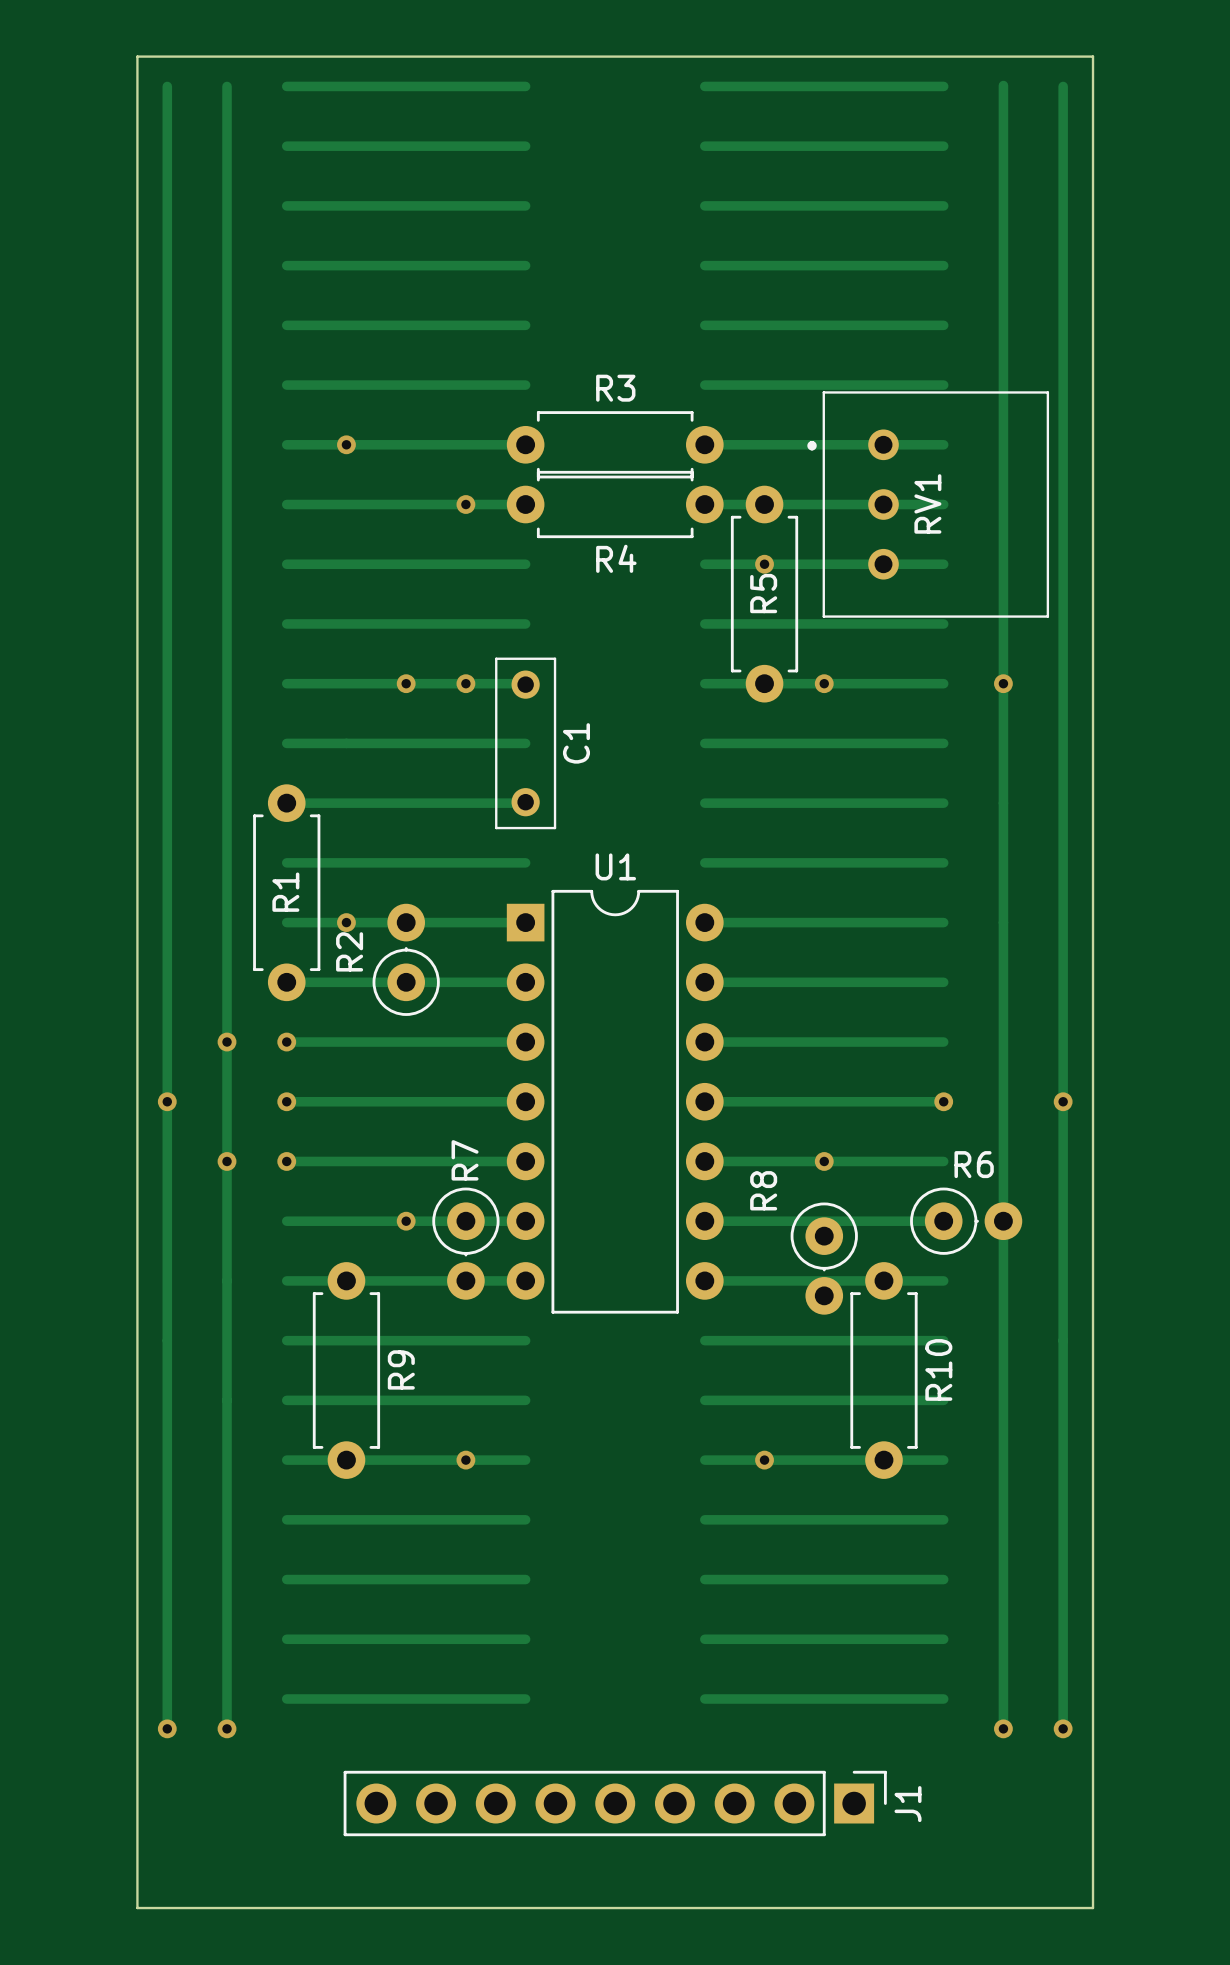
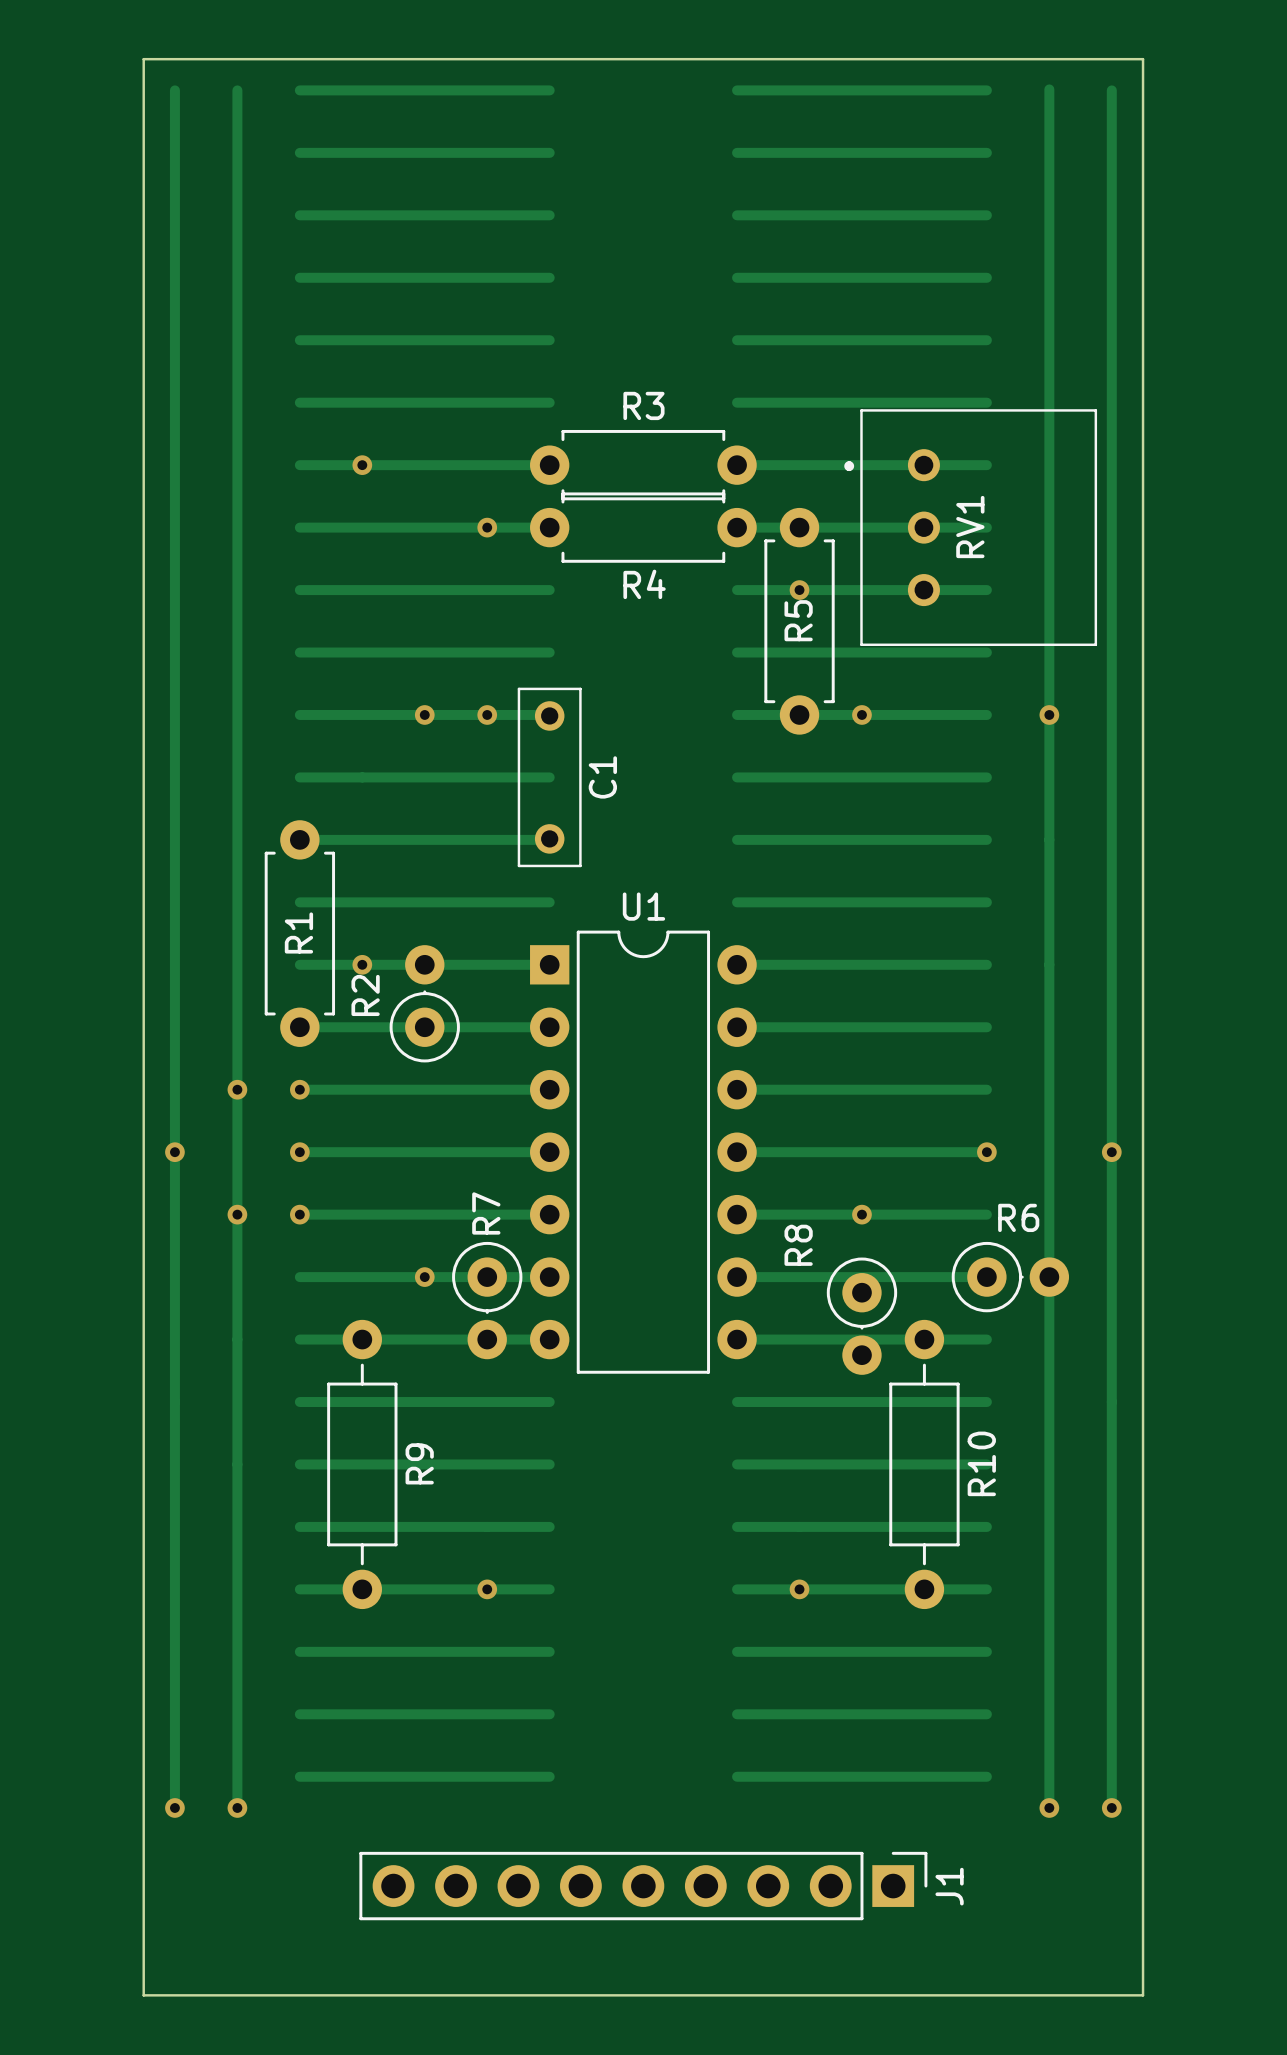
R9 footprint: [312, 1262, 381, 1479] -> [327, 1319, 398, 1610]
R10 footprint: [850, 1262, 918, 1479] -> [889, 1319, 960, 1610]
via position: (465, 1460) -> (487, 1589)
via position: (764, 1460) -> (799, 1589)

